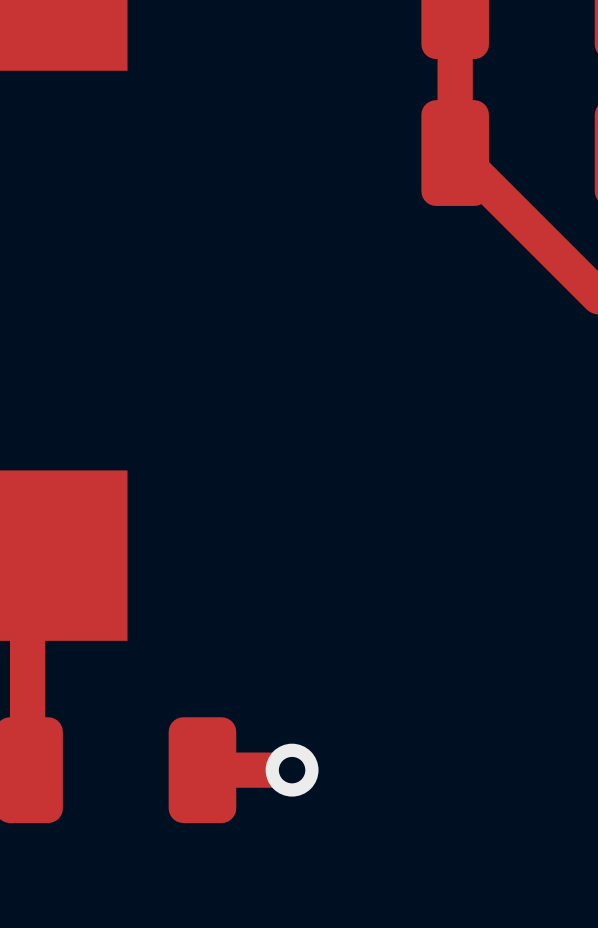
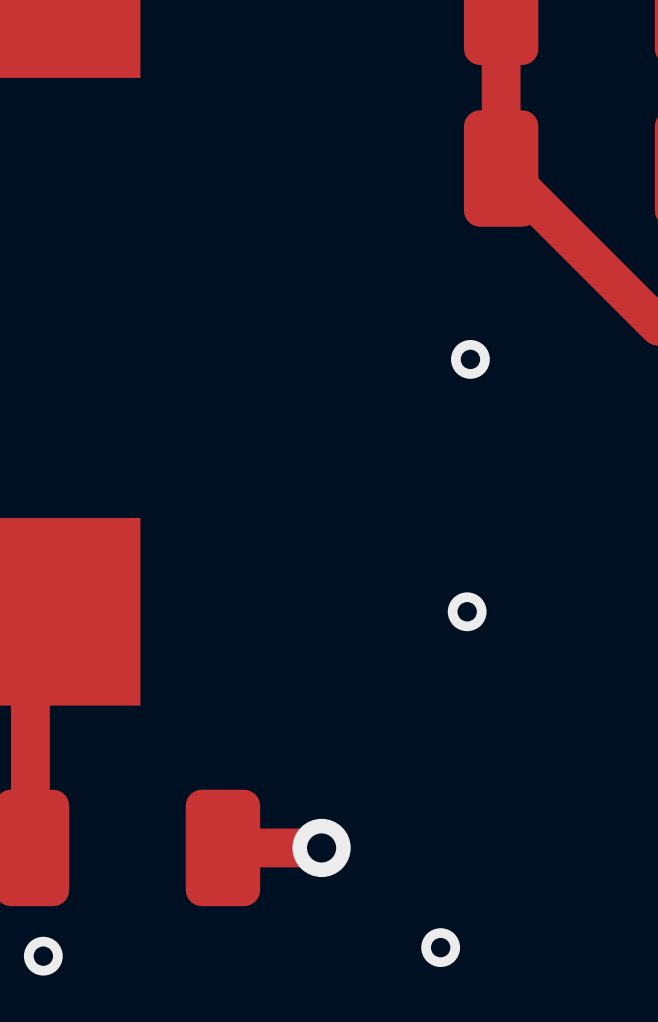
via: none -> (470, 359)
via: none -> (467, 611)
via: none -> (440, 947)
via: none -> (43, 956)

